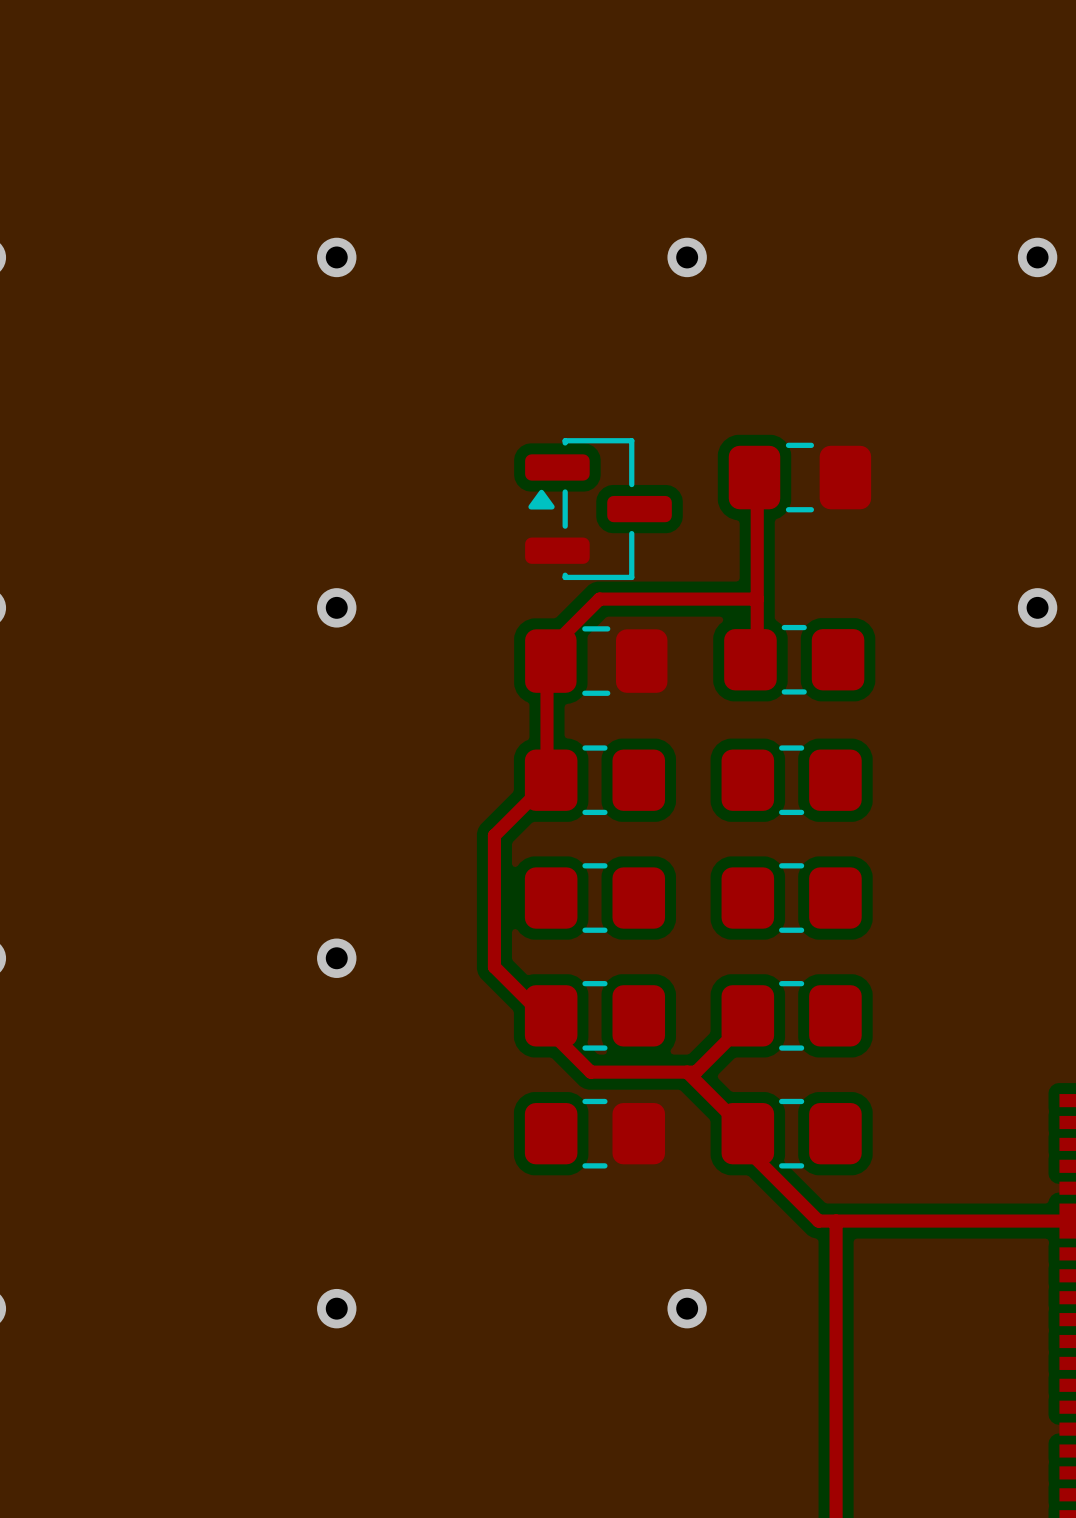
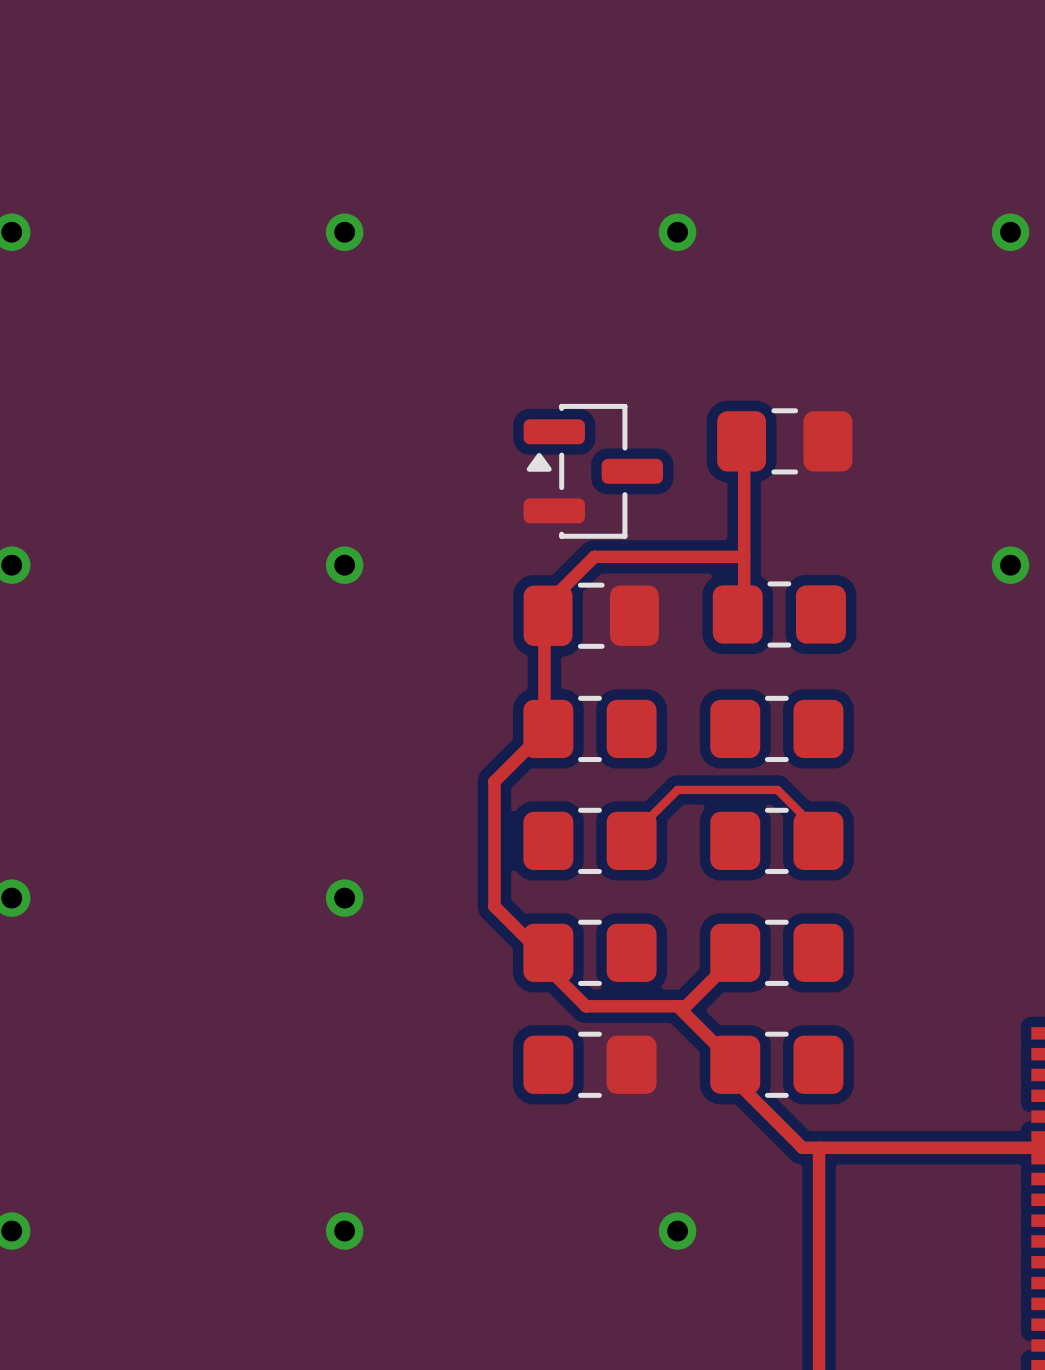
top track: none -> (627, 839) (677, 789) (777, 789) (819, 831) (819, 839)

